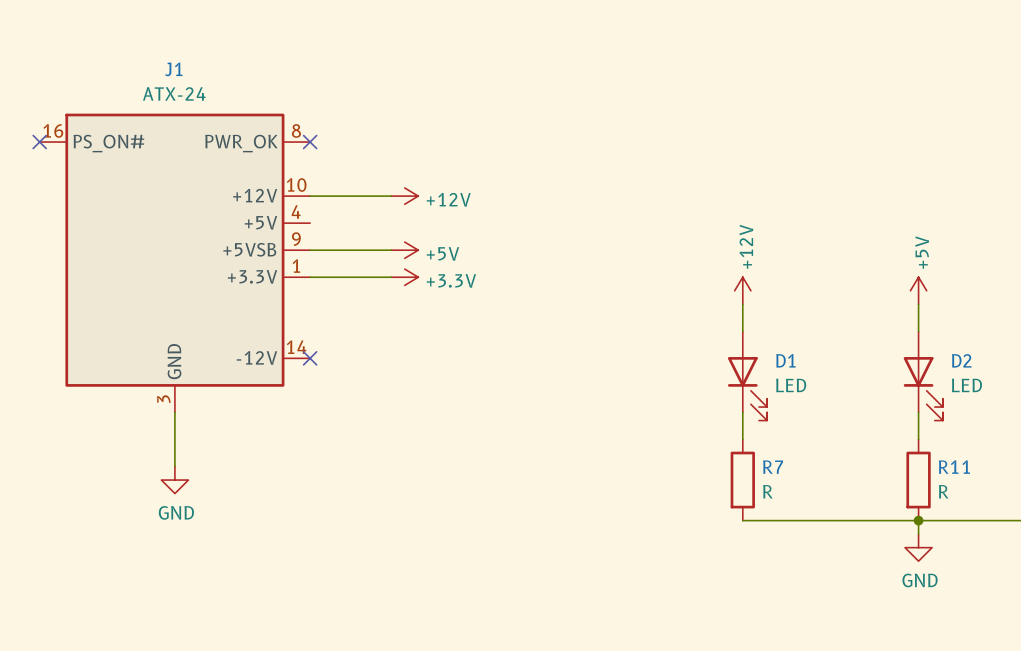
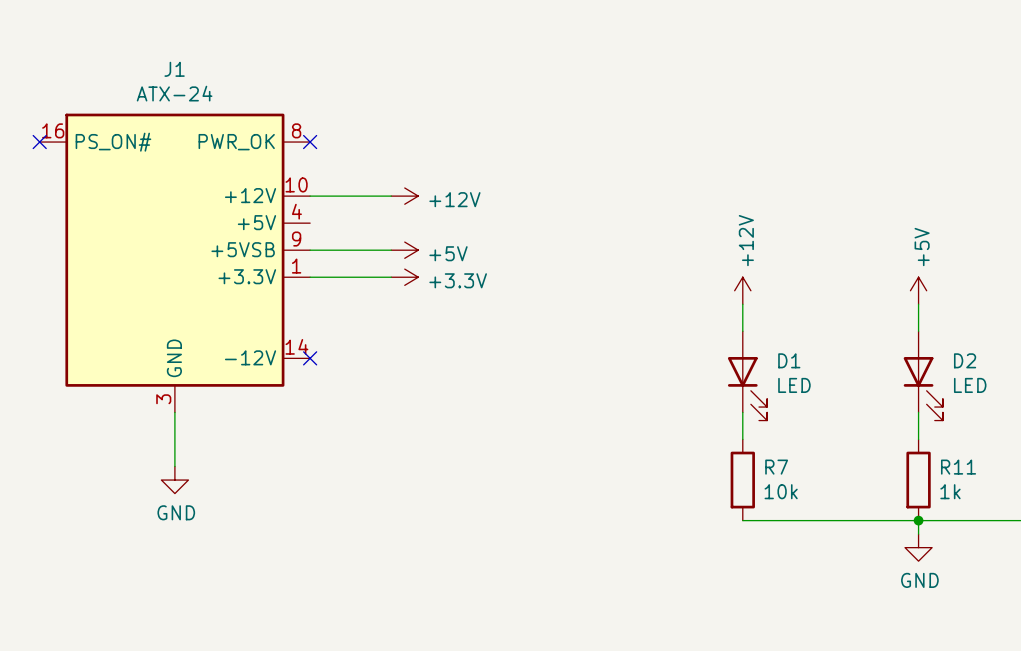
R7 value: R (767, 491) -> 10k (781, 491)
R11 value: R (943, 491) -> 1k (950, 491)

